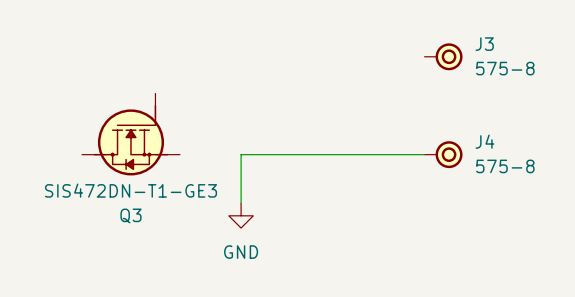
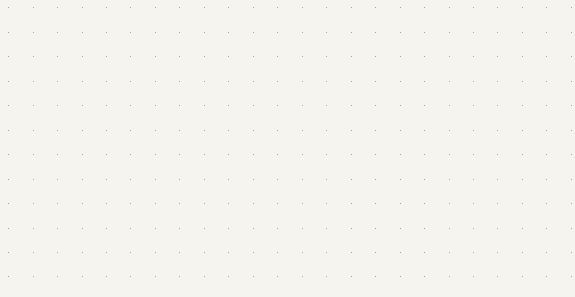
J3: (443, 56) -> none
Q3: (130, 134) -> none
wire: (424, 154) (241, 154) (241, 203) -> none
J4: (443, 154) -> none
power symbol: GND (241, 215) -> none

